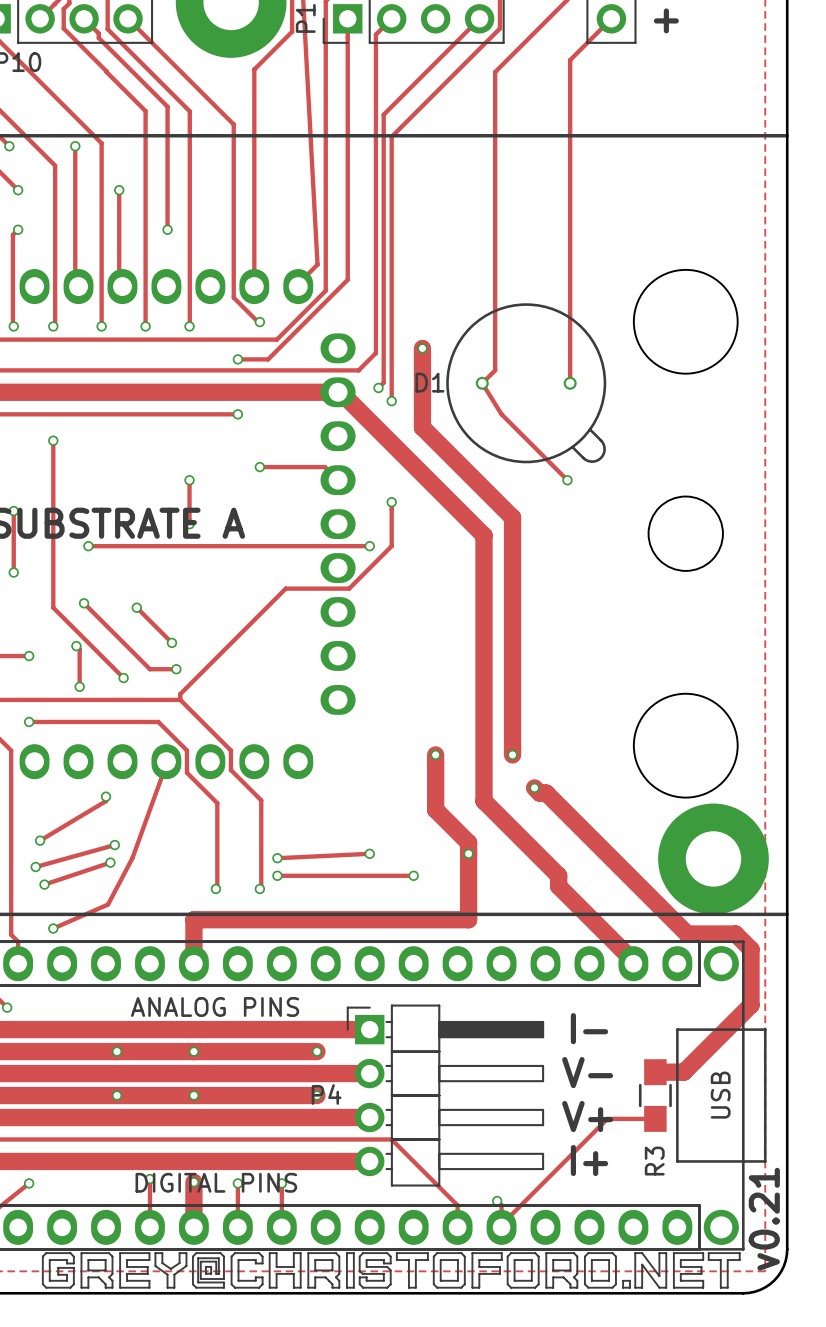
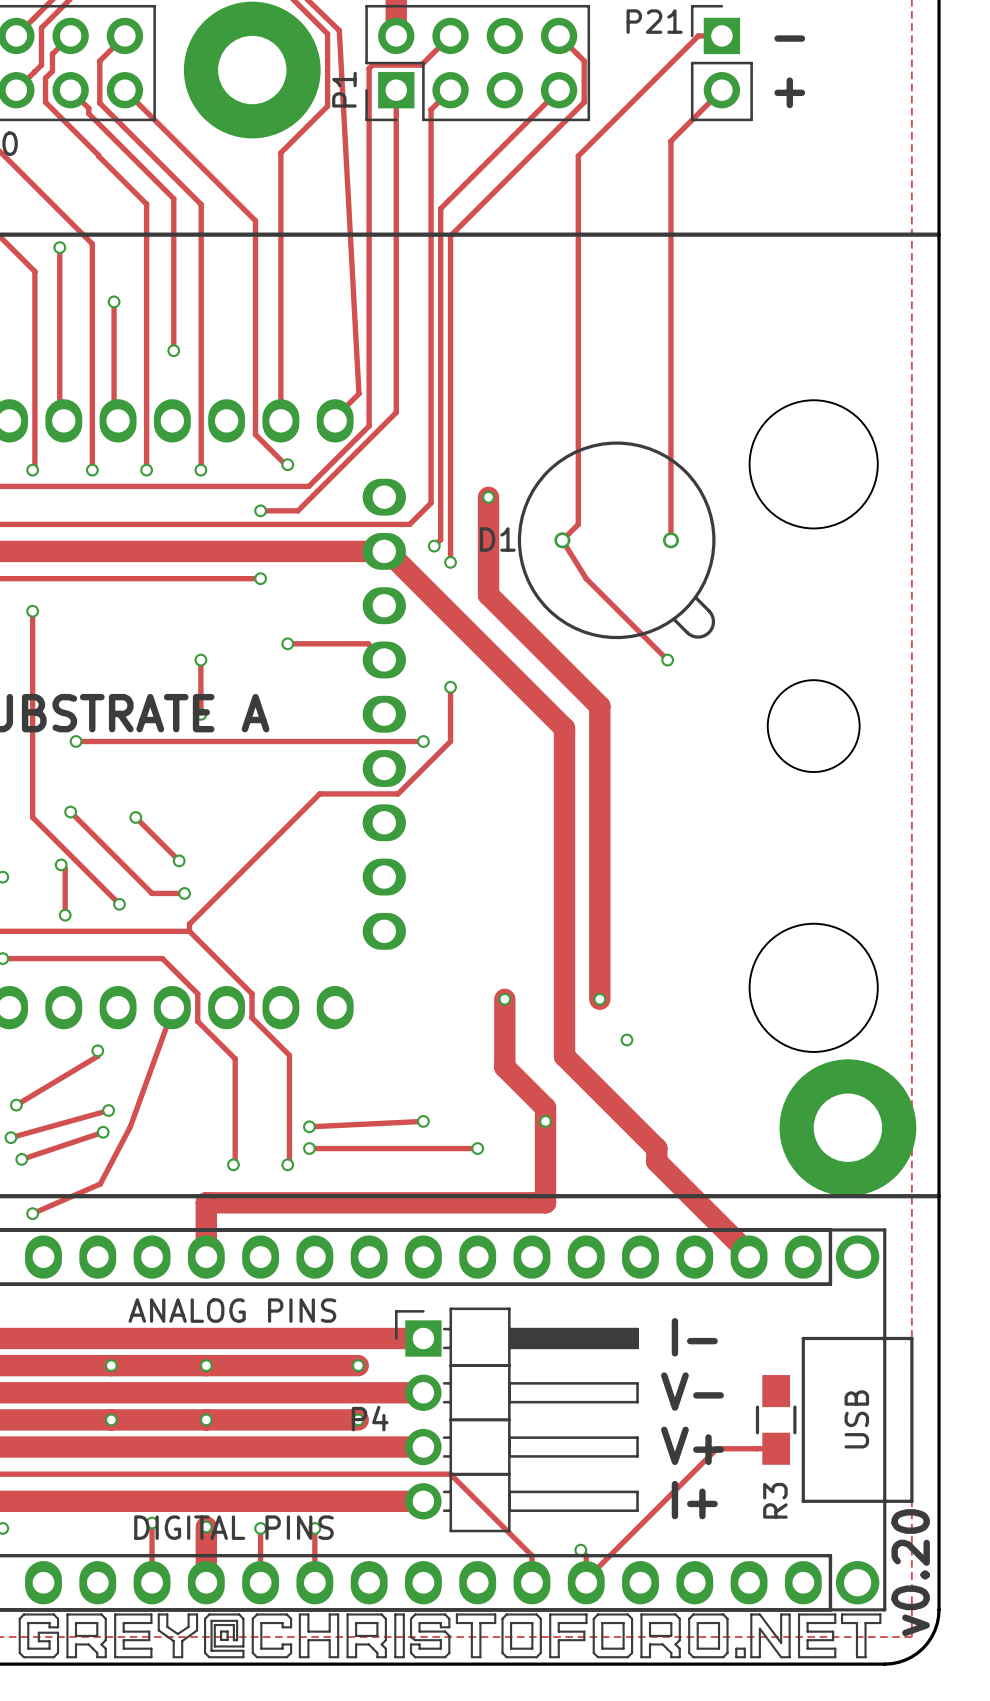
track: (534, 787) (539, 793) (546, 793) (687, 934) (735, 934) (751, 949) (751, 1005) (683, 1072) (655, 1072) -> none
text: v0.21 (764, 1219) -> v0.20 (910, 1572)

